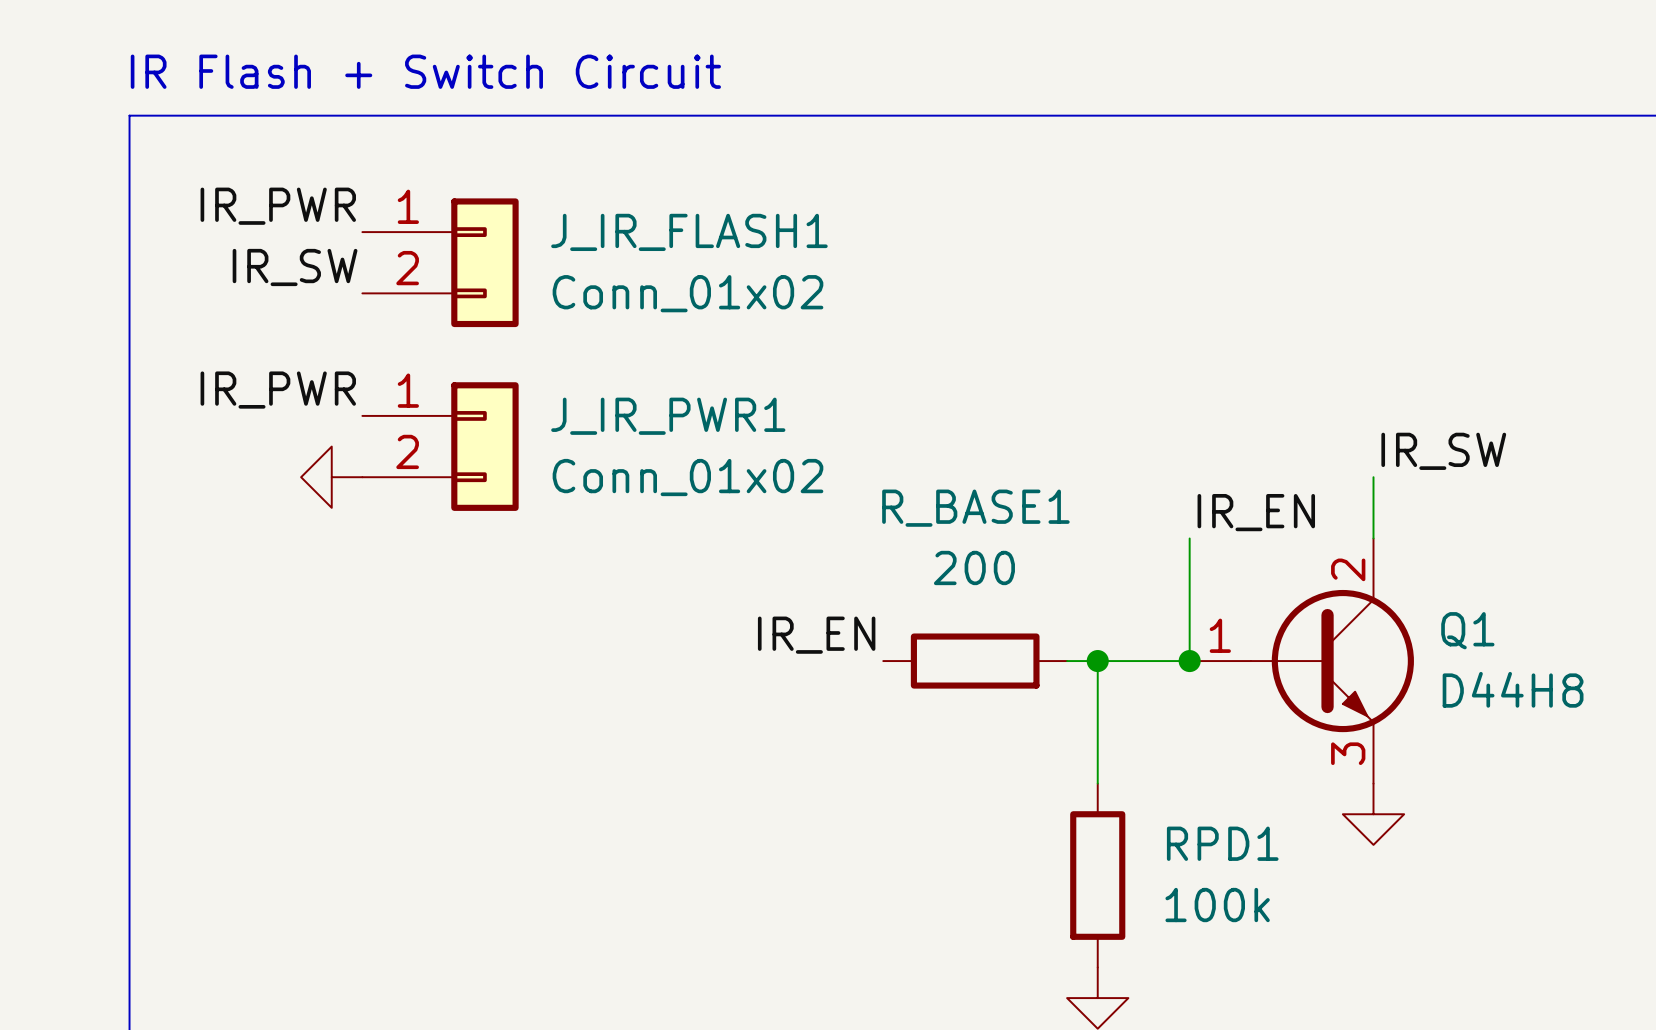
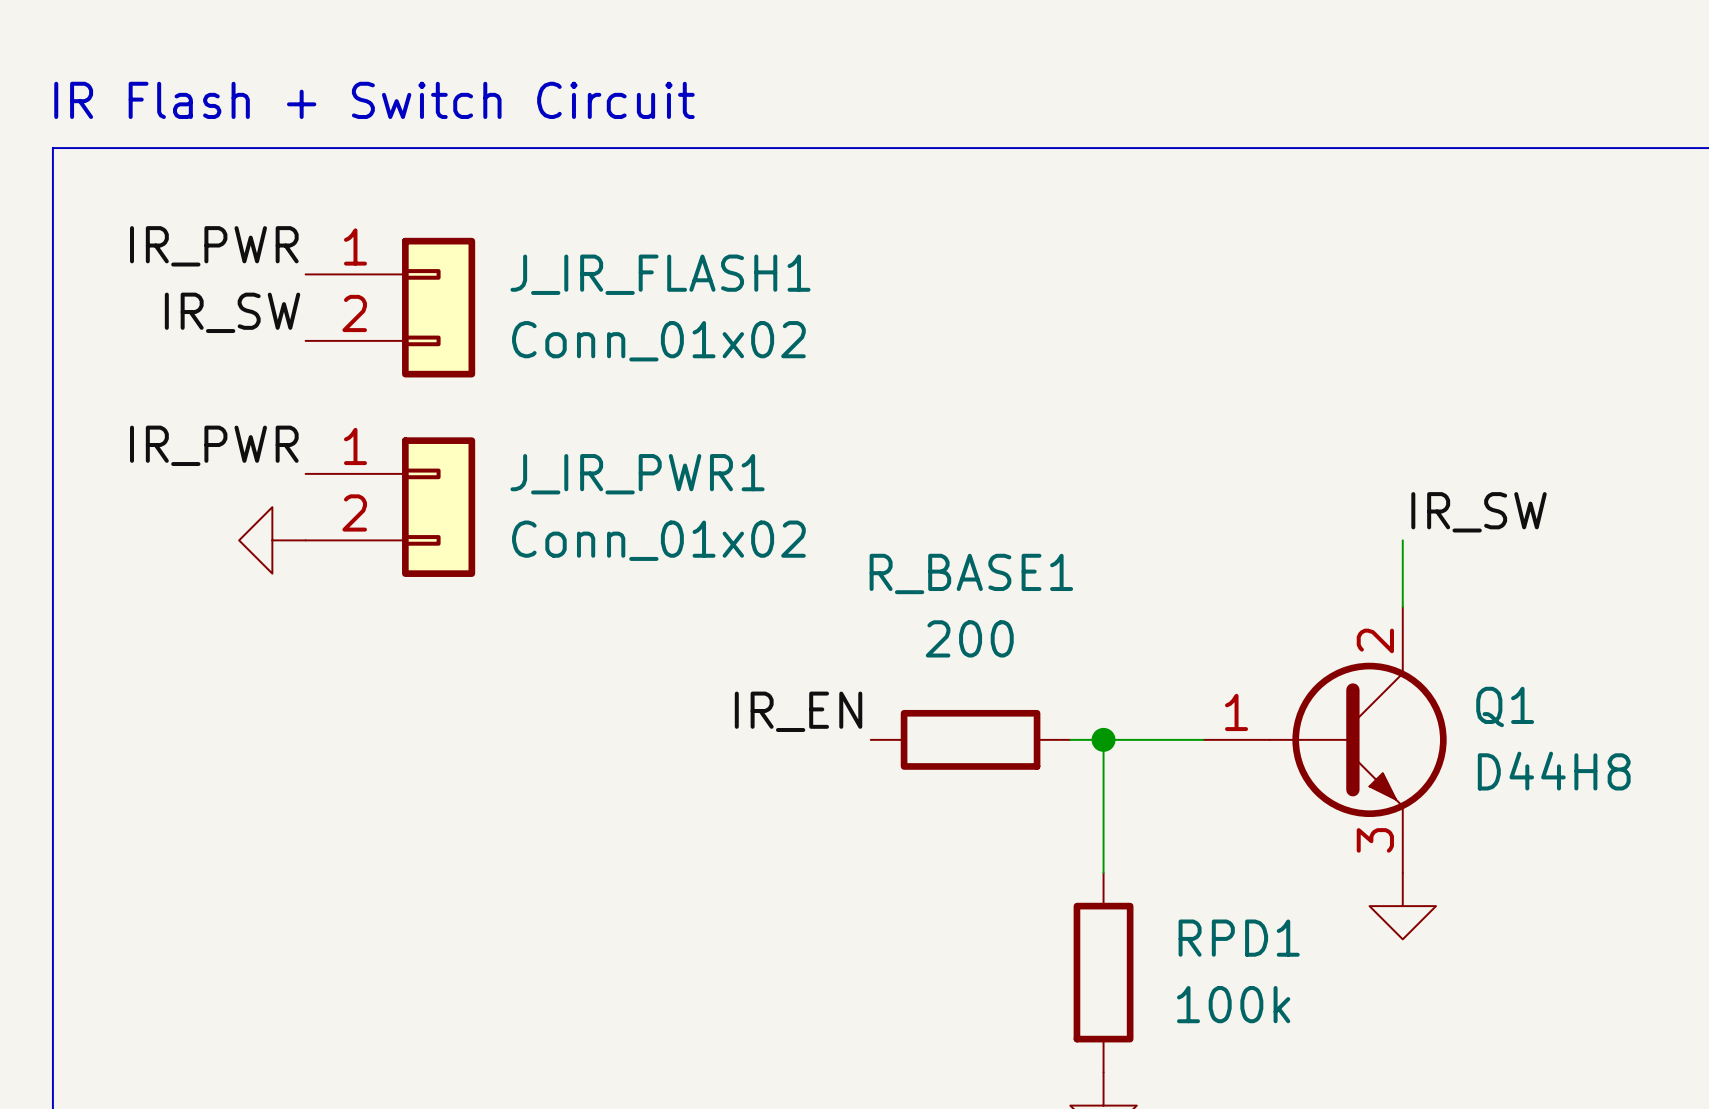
label: IR_EN (1256, 512) -> none
wire: (1189, 538) (1189, 661) -> none
junction: (1189, 661) -> none

